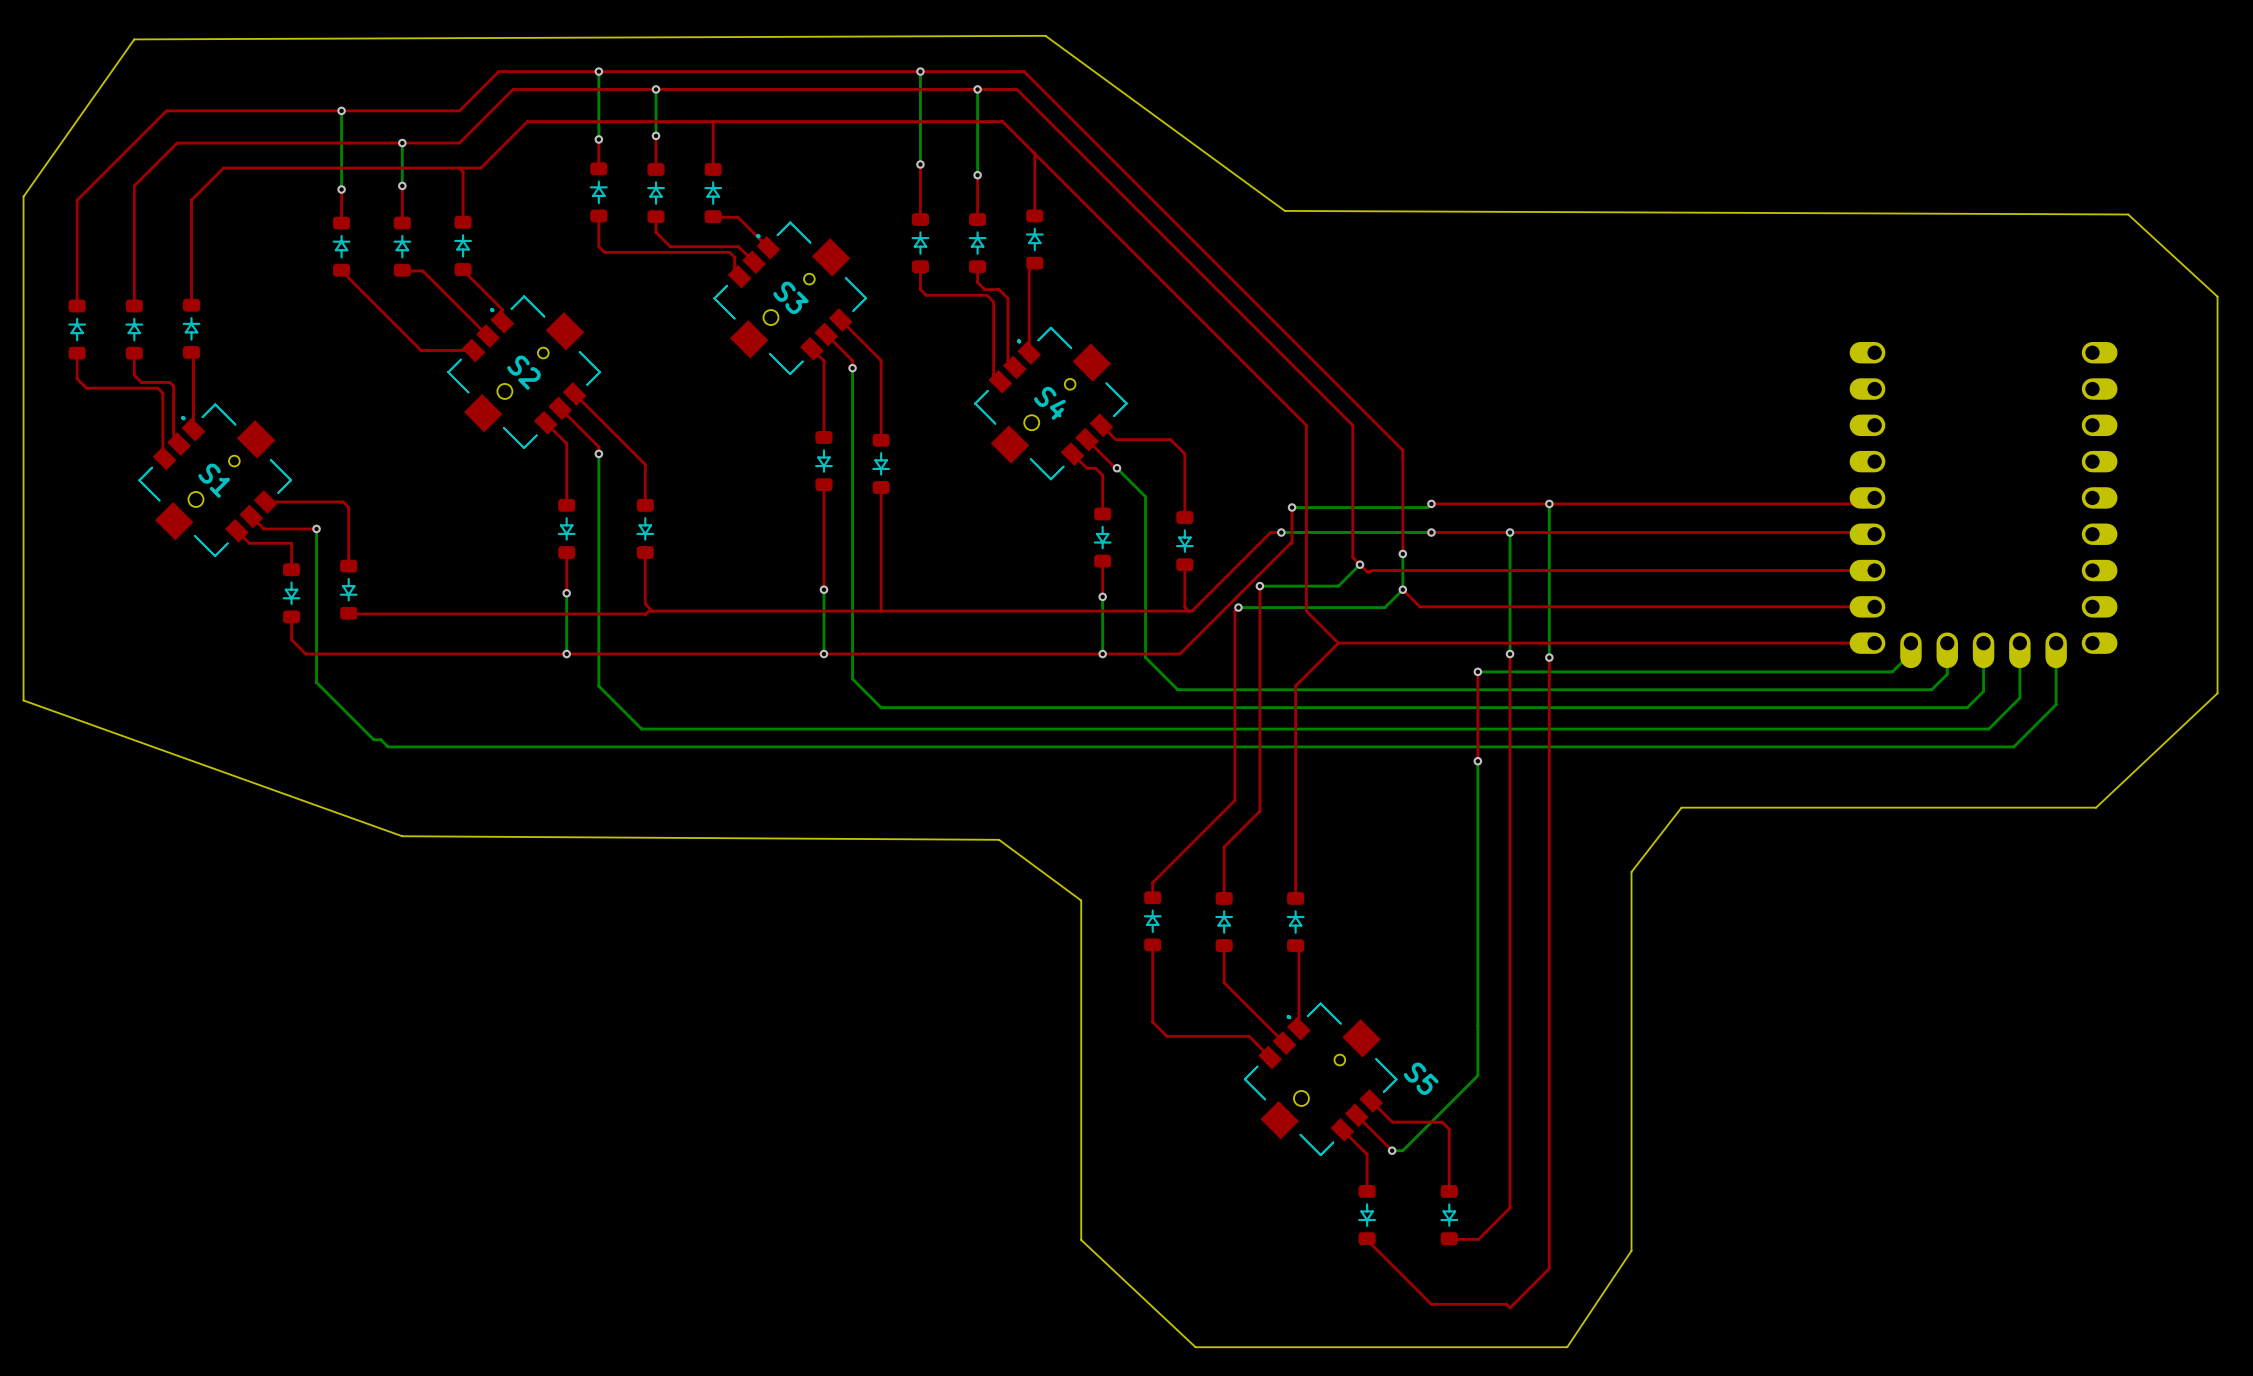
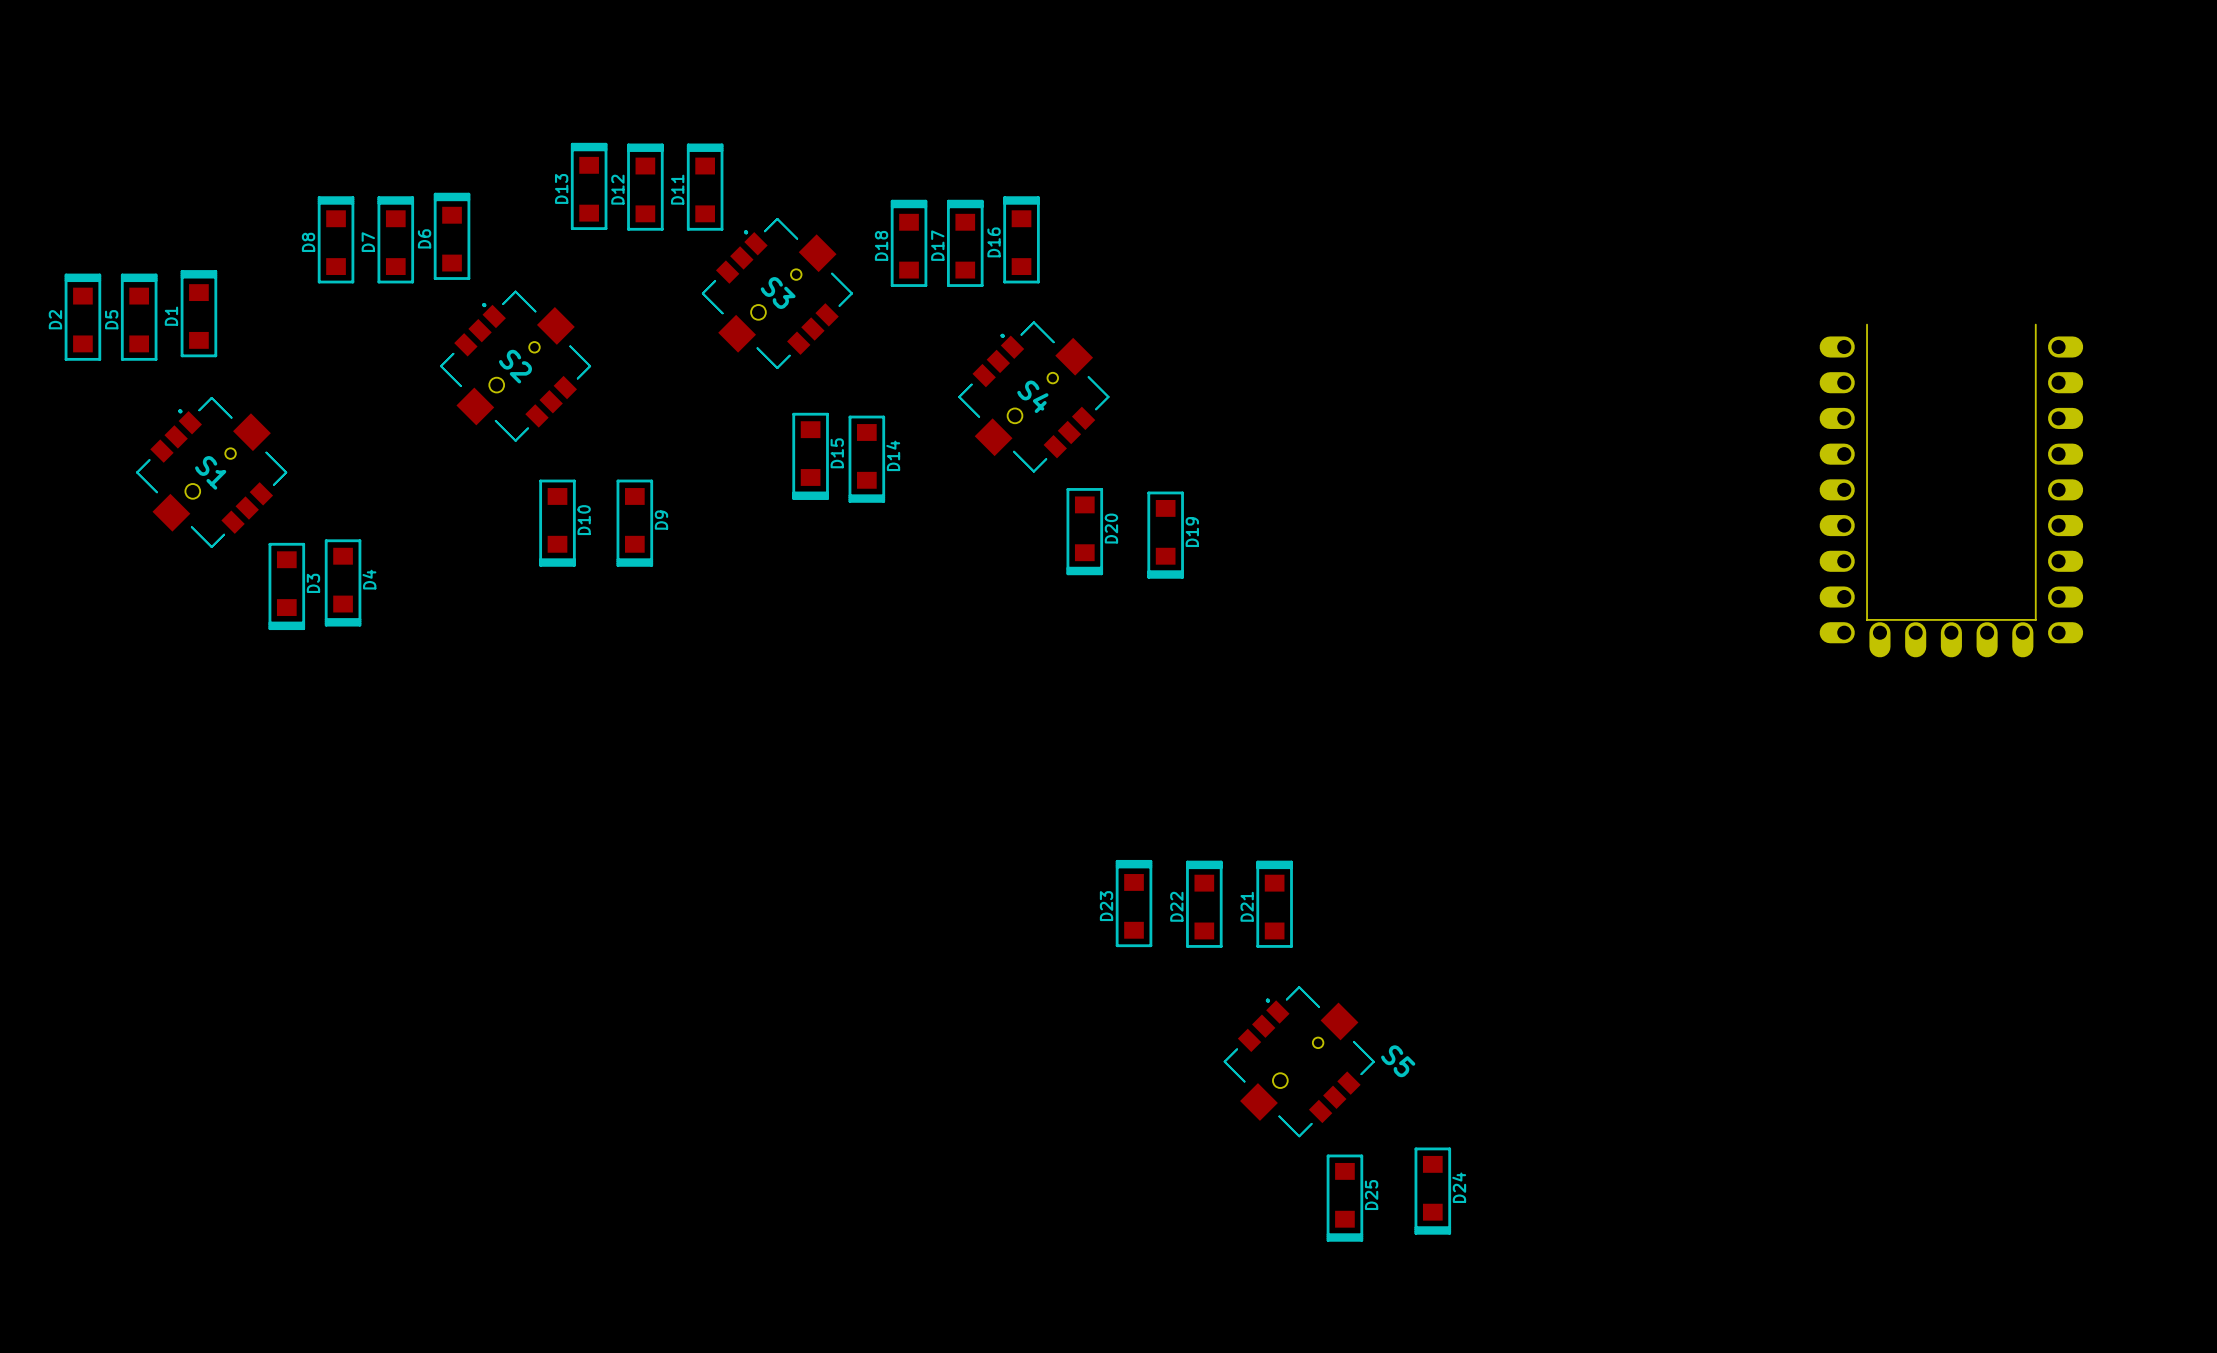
board edge: (1045, 35) (1284, 210) (2128, 214) (2217, 296) (2217, 693) (2096, 807) (1681, 807) (1631, 871) (1631, 1250) (1567, 1347) (1195, 1347) (1081, 1240) (1081, 900) (999, 839) (402, 836) (23, 700) (23, 196) (134, 39) (1045, 35) -> none
bottom track: (598, 71) (598, 139) -> none
via: (598, 71) -> none
bottom track: (920, 71) (920, 164) -> none
via: (920, 71) -> none
bottom track: (656, 89) (656, 135) -> none
via: (656, 89) -> none
bottom track: (977, 89) (977, 175) -> none
via: (977, 89) -> none
bottom track: (341, 110) (341, 189) -> none
via: (341, 110) -> none
top track: (713, 121) (713, 168) -> none
top track: (656, 135) (656, 168) -> none
via: (656, 135) -> none
top track: (598, 139) (598, 168) -> none
via: (598, 139) -> none
bottom track: (402, 143) (402, 185) -> none
via: (402, 143) -> none
top track: (1034, 153) (1034, 215) -> none
top track: (920, 164) (920, 218) -> none
via: (920, 164) -> none
top track: (459, 168) (463, 171) (463, 221) -> none
top track: (977, 175) (977, 218) -> none
via: (977, 175) -> none
top track: (402, 185) (402, 222) -> none
via: (402, 185) -> none
top track: (341, 189) (341, 222) -> none
via: (341, 189) -> none
D13: none -> (589, 186)
D12: none -> (645, 187)
D11: none -> (705, 187)
part: (598, 192) -> none
part: (656, 193) -> none
part: (713, 193) -> none
top track: (598, 216) (598, 246) (604, 252) (729, 252) (734, 257) (734, 271) (739, 276) -> none
top track: (656, 217) (656, 232) (670, 246) (738, 246) (754, 262) -> none
top track: (713, 217) (738, 217) (768, 247) -> none
part: (1034, 239) -> none
D6: none -> (452, 236)
D8: none -> (336, 239)
D7: none -> (395, 239)
part: (920, 243) -> none
part: (977, 243) -> none
D16: none -> (1021, 239)
part: (463, 245) -> none
part: (341, 246) -> none
part: (402, 246) -> none
D18: none -> (909, 243)
D17: none -> (965, 243)
top track: (1034, 263) (1029, 269) (1029, 352) -> none
top track: (920, 267) (920, 289) (926, 295) (986, 295) (993, 301) (993, 374) (1000, 381) -> none
top track: (977, 267) (977, 282) (984, 289) (999, 289) (1007, 298) (1007, 360) (1014, 367) -> none
top track: (341, 270) (421, 350) (473, 350) -> none
top track: (402, 270) (422, 270) (487, 336) -> none
top track: (463, 270) (502, 309) (502, 321) -> none
top track: (191, 304) (191, 200) (223, 168) (480, 168) (527, 121) (1002, 121) (1306, 425) (1306, 611) (1338, 643) -> none
top track: (77, 305) (77, 200) (166, 110) (459, 110) (498, 71) (1024, 71) (1402, 450) (1402, 553) -> none
top track: (134, 305) (134, 185) (177, 143) (459, 143) (513, 89) (1016, 89) (1352, 425) (1352, 557) (1367, 571) (1874, 570) -> none
D1: none -> (198, 313)
top track: (840, 320) (881, 360) (881, 439) -> none
D2: none -> (82, 317)
D5: none -> (139, 317)
part: (191, 328) -> none
part: (77, 329) -> none
part: (134, 329) -> none
top track: (826, 334) (852, 360) (852, 368) -> none
part footprint: [1849, 341, 2118, 669] -> [1819, 323, 2084, 658]
top track: (811, 348) (823, 360) (823, 436) -> none
top track: (77, 353) (77, 378) (86, 388) (157, 388) (162, 393) (162, 456) (164, 458) -> none
top track: (134, 353) (134, 375) (141, 382) (170, 382) (173, 386) (173, 438) (179, 444) -> none
top track: (191, 353) (193, 355) (193, 429) -> none
bottom track: (852, 368) (852, 679) (881, 707) (1967, 707) (1983, 691) (1983, 643) -> none
via: (852, 368) -> none
top track: (574, 393) (645, 464) (645, 504) -> none
top track: (560, 408) (598, 446) (598, 453) -> none
top track: (545, 422) (566, 443) (566, 504) -> none
top track: (1101, 425) (1115, 439) (1170, 439) (1184, 453) (1184, 516) -> none
top track: (1087, 439) (1116, 468) -> none
bottom track: (598, 453) (598, 686) (641, 729) (1988, 729) (2019, 698) (2019, 643) -> none
via: (598, 453) -> none
top track: (1072, 454) (1086, 468) (1095, 468) (1102, 475) (1102, 513) -> none
part: (823, 461) -> none
D15: none -> (810, 456)
part: (881, 463) -> none
D14: none -> (866, 459)
bottom track: (1116, 468) (1145, 496) (1145, 657) (1177, 689) (1931, 689) (1947, 674) (1947, 643) -> none
via: (1116, 468) -> none
top track: (823, 485) (823, 589) -> none
top track: (881, 488) (881, 611) -> none
top track: (1874, 497) (1868, 503) (1431, 503) -> none
top track: (265, 501) (343, 501) (348, 507) (348, 565) -> none
bottom track: (1431, 503) (1427, 507) (1292, 507) -> none
via: (1431, 503) -> none
bottom track: (1549, 503) (1549, 657) -> none
via: (1549, 503) -> none
top track: (1292, 507) (1292, 543) (1179, 654) (305, 654) (291, 639) (291, 617) -> none
via: (1292, 507) -> none
top track: (251, 516) (263, 528) (316, 528) -> none
bottom track: (316, 528) (316, 682) (373, 739) (380, 739) (388, 746) (2013, 746) (2056, 704) (2056, 643) -> none
via: (316, 528) -> none
part: (566, 528) -> none
part: (645, 528) -> none
top track: (236, 530) (249, 543) (291, 543) (291, 568) -> none
D10: none -> (557, 523)
D9: none -> (634, 523)
top track: (1281, 532) (1270, 532) (1192, 611) (648, 611) (645, 614) (348, 613) -> none
bottom track: (1281, 532) (1431, 532) -> none
via: (1281, 532) -> none
top track: (1431, 532) (1872, 532) (1874, 534) -> none
via: (1431, 532) -> none
bottom track: (1510, 532) (1510, 654) -> none
via: (1510, 532) -> none
part: (1102, 537) -> none
D20: none -> (1084, 531)
part: (1184, 541) -> none
D19: none -> (1165, 535)
top track: (566, 553) (566, 593) -> none
top track: (645, 553) (645, 603) (652, 611) -> none
bottom track: (1402, 553) (1402, 589) (1384, 607) (1238, 607) -> none
via: (1402, 553) -> none
top track: (1102, 561) (1102, 596) -> none
bottom track: (1359, 564) (1338, 586) (1259, 586) -> none
via: (1359, 564) -> none
top track: (1184, 565) (1184, 607) (1188, 611) -> none
top track: (1259, 586) (1259, 811) (1224, 846) (1224, 897) -> none
via: (1259, 586) -> none
part: (348, 589) -> none
bottom track: (823, 589) (823, 654) -> none
via: (823, 589) -> none
top track: (1402, 589) (1419, 606) (1874, 606) -> none
via: (1402, 589) -> none
D4: none -> (343, 582)
part: (291, 593) -> none
bottom track: (566, 593) (566, 654) -> none
via: (566, 593) -> none
D3: none -> (286, 586)
bottom track: (1102, 596) (1102, 654) -> none
via: (1102, 596) -> none
top track: (1238, 607) (1234, 611) (1234, 800) (1152, 882) (1152, 897) -> none
via: (1238, 607) -> none
top track: (1338, 643) (1874, 643) -> none
top track: (1338, 643) (1295, 685) (1295, 897) -> none
bottom track: (1910, 643) (1910, 653) (1892, 671) (1477, 671) -> none
via: (566, 654) -> none
via: (823, 654) -> none
via: (1102, 654) -> none
top track: (1510, 654) (1510, 1207) (1478, 1239) (1449, 1239) -> none
via: (1510, 654) -> none
top track: (1549, 657) (1549, 1268) (1510, 1307) (1506, 1304) (1431, 1304) (1367, 1239) -> none
via: (1549, 657) -> none
top track: (1477, 671) (1477, 761) -> none
via: (1477, 671) -> none
bottom track: (1477, 761) (1477, 1075) (1402, 1150) (1392, 1150) -> none
via: (1477, 761) -> none
D23: none -> (1134, 903)
D22: none -> (1204, 904)
D21: none -> (1274, 904)
part: (1152, 921) -> none
part: (1224, 922) -> none
part: (1295, 922) -> none
top track: (1152, 945) (1152, 1022) (1167, 1036) (1249, 1036) (1256, 1043) -> none
top track: (1224, 946) (1224, 982) (1284, 1043) -> none
top track: (1295, 946) (1298, 949) (1298, 1028) -> none
top track: (1256, 1043) (1270, 1057) -> none
top track: (1371, 1100) (1392, 1122) (1442, 1122) (1449, 1129) (1449, 1190) -> none
top track: (1356, 1115) (1392, 1150) -> none
top track: (1342, 1129) (1363, 1150) -> none
top track: (1363, 1150) (1367, 1154) (1367, 1190) -> none
via: (1392, 1150) -> none
D24: none -> (1432, 1191)
part: (1367, 1215) -> none
part: (1449, 1215) -> none
D25: none -> (1344, 1198)

